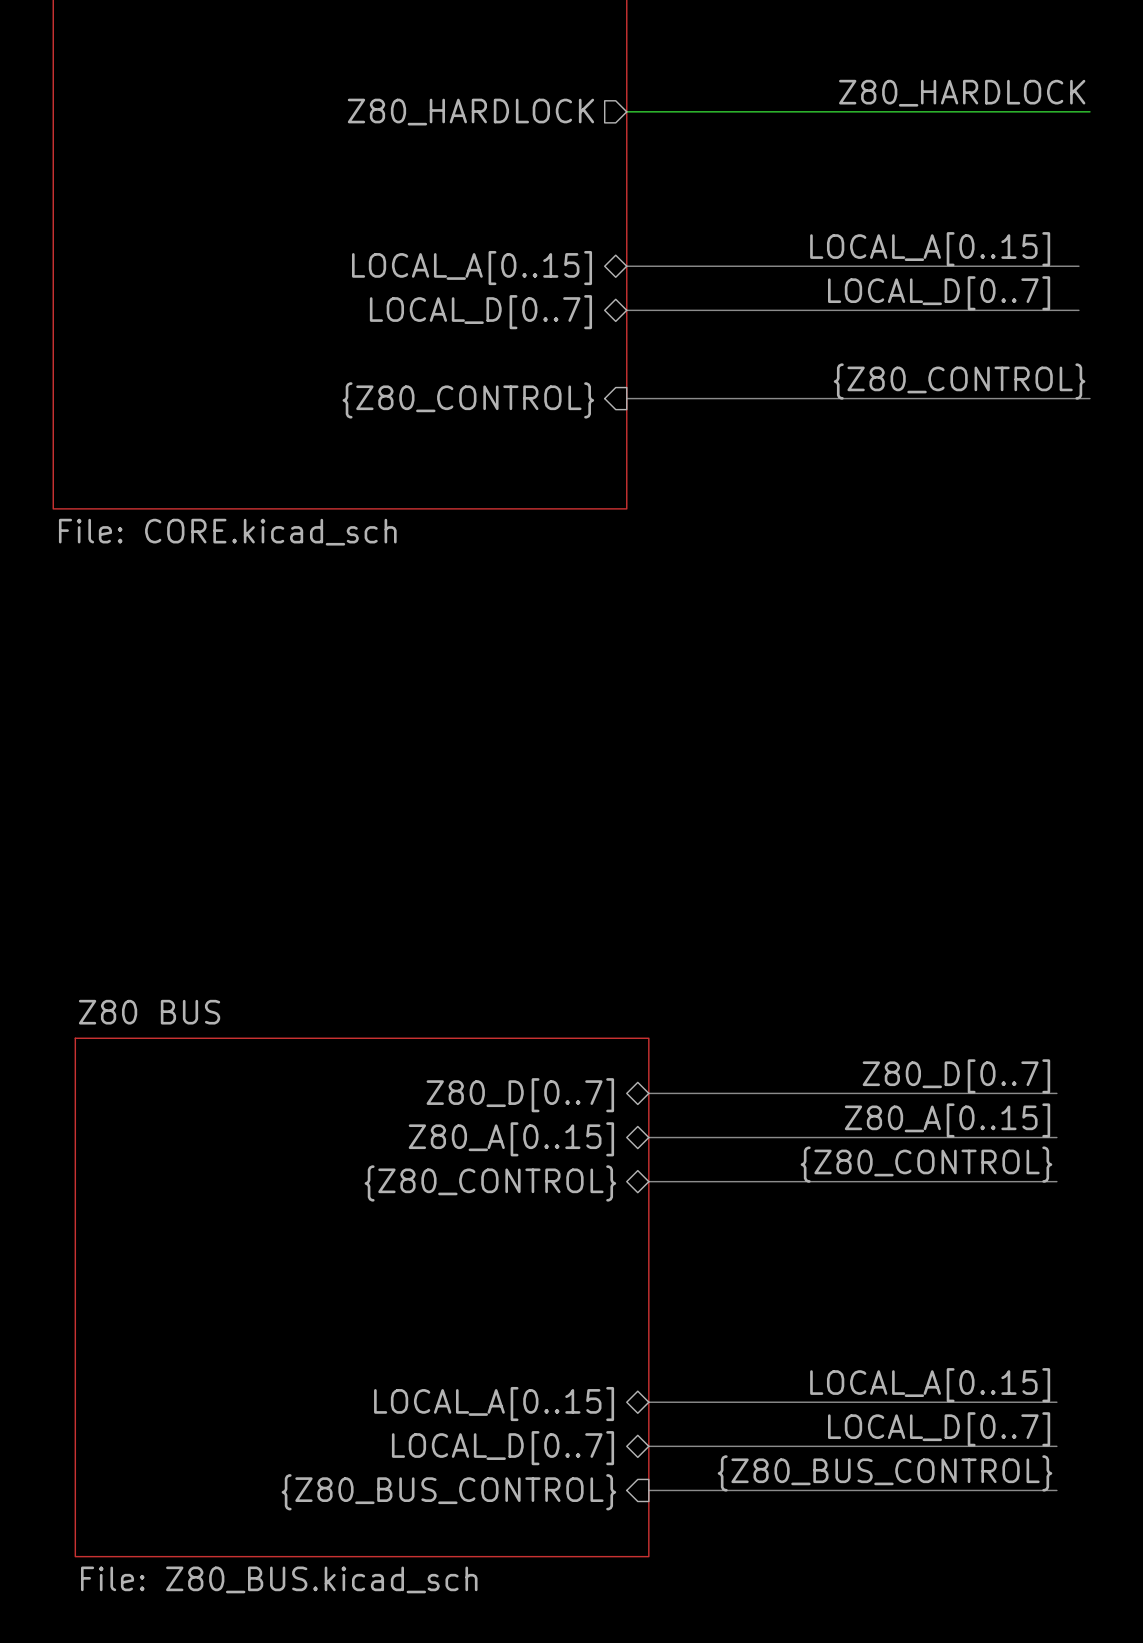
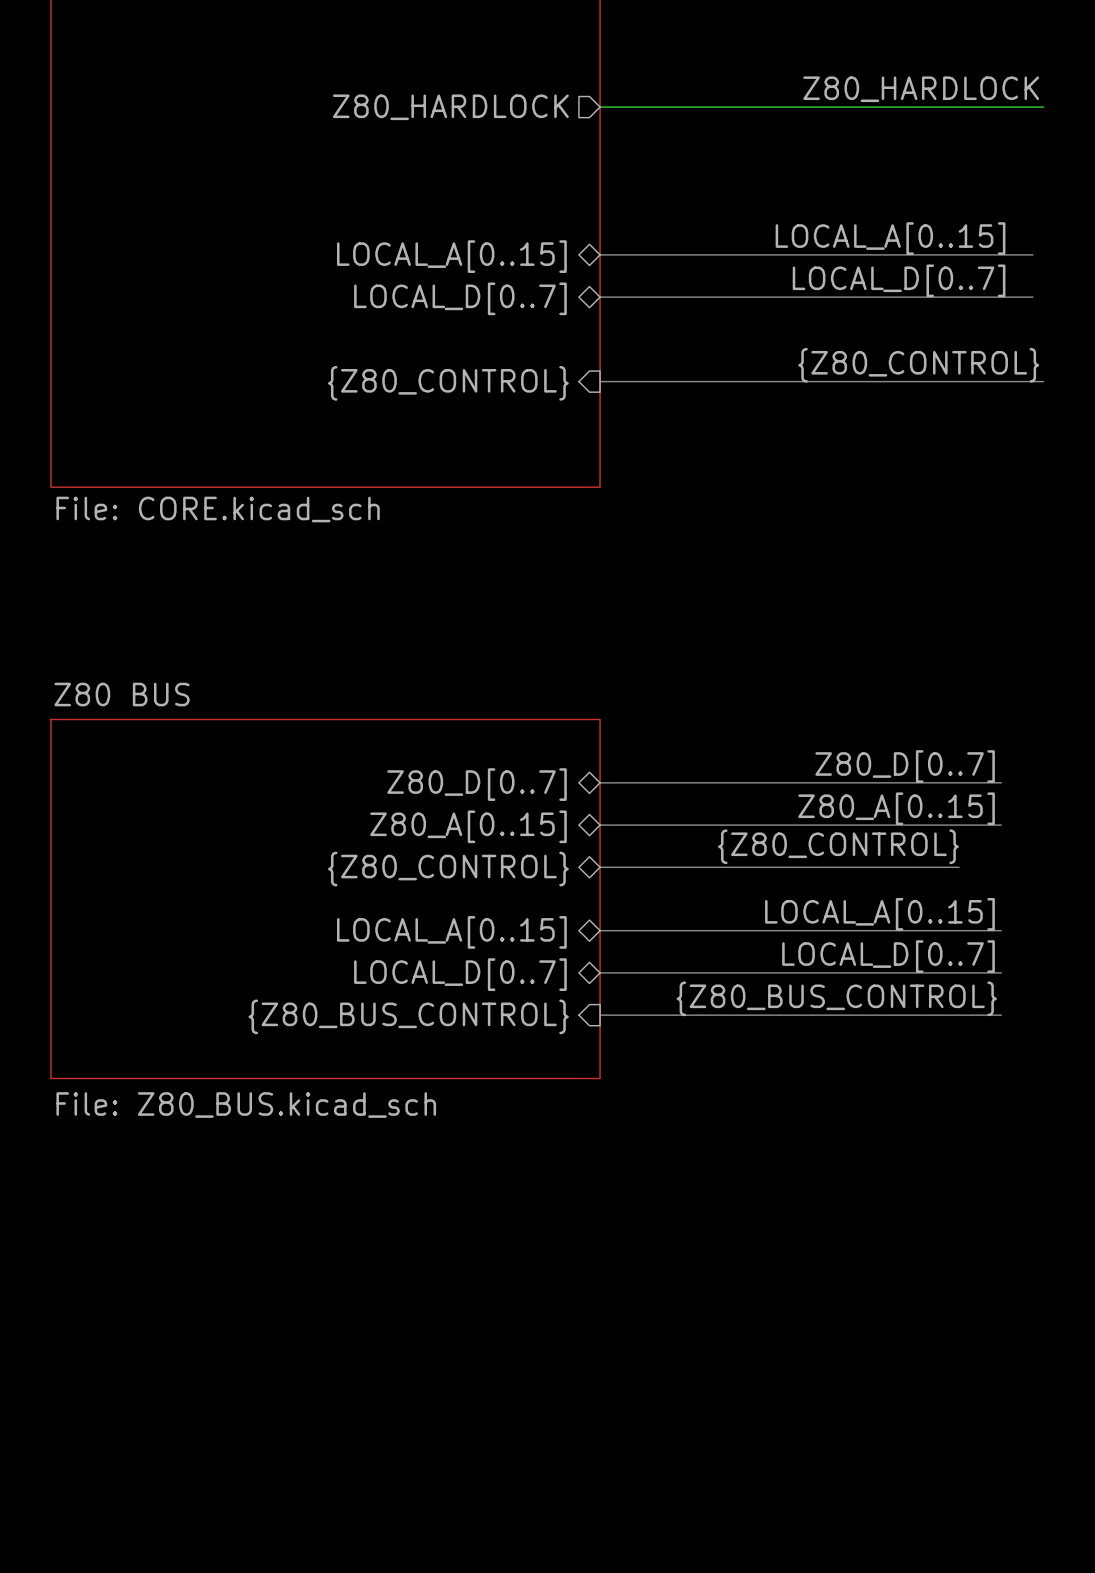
bus: none -> (600, 782) (1001, 782)
bus: none -> (600, 825) (1001, 825)
bus: none -> (600, 867) (959, 867)
bus: none -> (600, 930) (1001, 930)
sheet Z80 BUS name position: Z80 BUS (149, 1012) -> Z80 BUS (122, 694)
bus: none -> (600, 972) (1001, 972)
sheet Z80 BUS shape: [75, 1038, 649, 1557] -> [50, 719, 601, 1079]
bus: none -> (600, 1015) (1001, 1015)
label position: Z80_D[0..7] (956, 1076) -> Z80_D[0..7] (905, 766)
bus: (648, 1093) (1056, 1093) -> none
sheet pin position: Z80_D[0..7] (520, 1095) -> Z80_D[0..7] (477, 784)
label position: Z80_A[0..15] (947, 1120) -> Z80_A[0..15] (896, 808)
bus: (648, 1137) (1056, 1137) -> none
sheet pin position: Z80_A[0..15] (511, 1139) -> Z80_A[0..15] (468, 826)
label position: {Z80_CONTROL} (926, 1164) -> {Z80_CONTROL} (838, 846)
bus: (648, 1181) (1056, 1181) -> none
sheet pin position: {Z80_CONTROL} (490, 1183) -> {Z80_CONTROL} (448, 869)
label position: LOCAL_A[0..15] (930, 1385) -> LOCAL_A[0..15] (879, 914)
bus: (648, 1402) (1056, 1402) -> none
sheet pin position: LOCAL_A[0..15] (494, 1404) -> LOCAL_A[0..15] (451, 932)
label position: LOCAL_D[0..7] (939, 1429) -> LOCAL_D[0..7] (888, 956)
bus: (648, 1446) (1056, 1446) -> none
sheet pin position: LOCAL_D[0..7] (503, 1448) -> LOCAL_D[0..7] (460, 974)
label position: {Z80_BUS_CONTROL} (884, 1473) -> {Z80_BUS_CONTROL} (836, 998)
bus: (648, 1490) (1056, 1490) -> none
sheet pin position: {Z80_BUS_CONTROL} (448, 1492) -> {Z80_BUS_CONTROL} (408, 1016)
sheet Z80 BUS value position: File: Z80_BUS.kicad_sch (279, 1579) -> File: Z80_BUS.kicad_sch (246, 1105)

